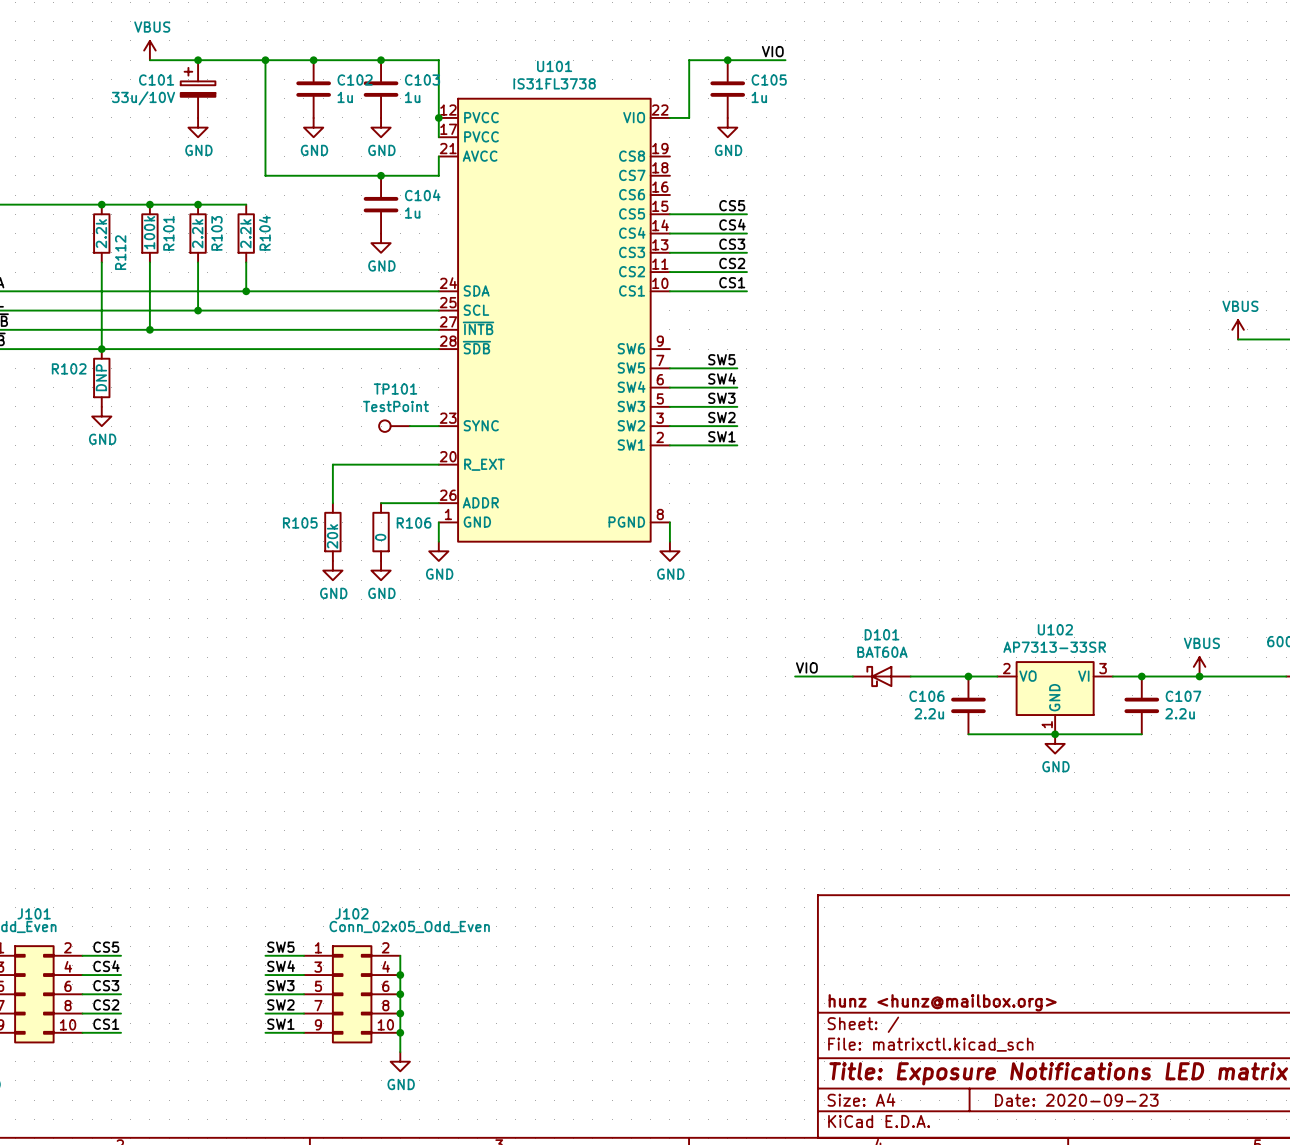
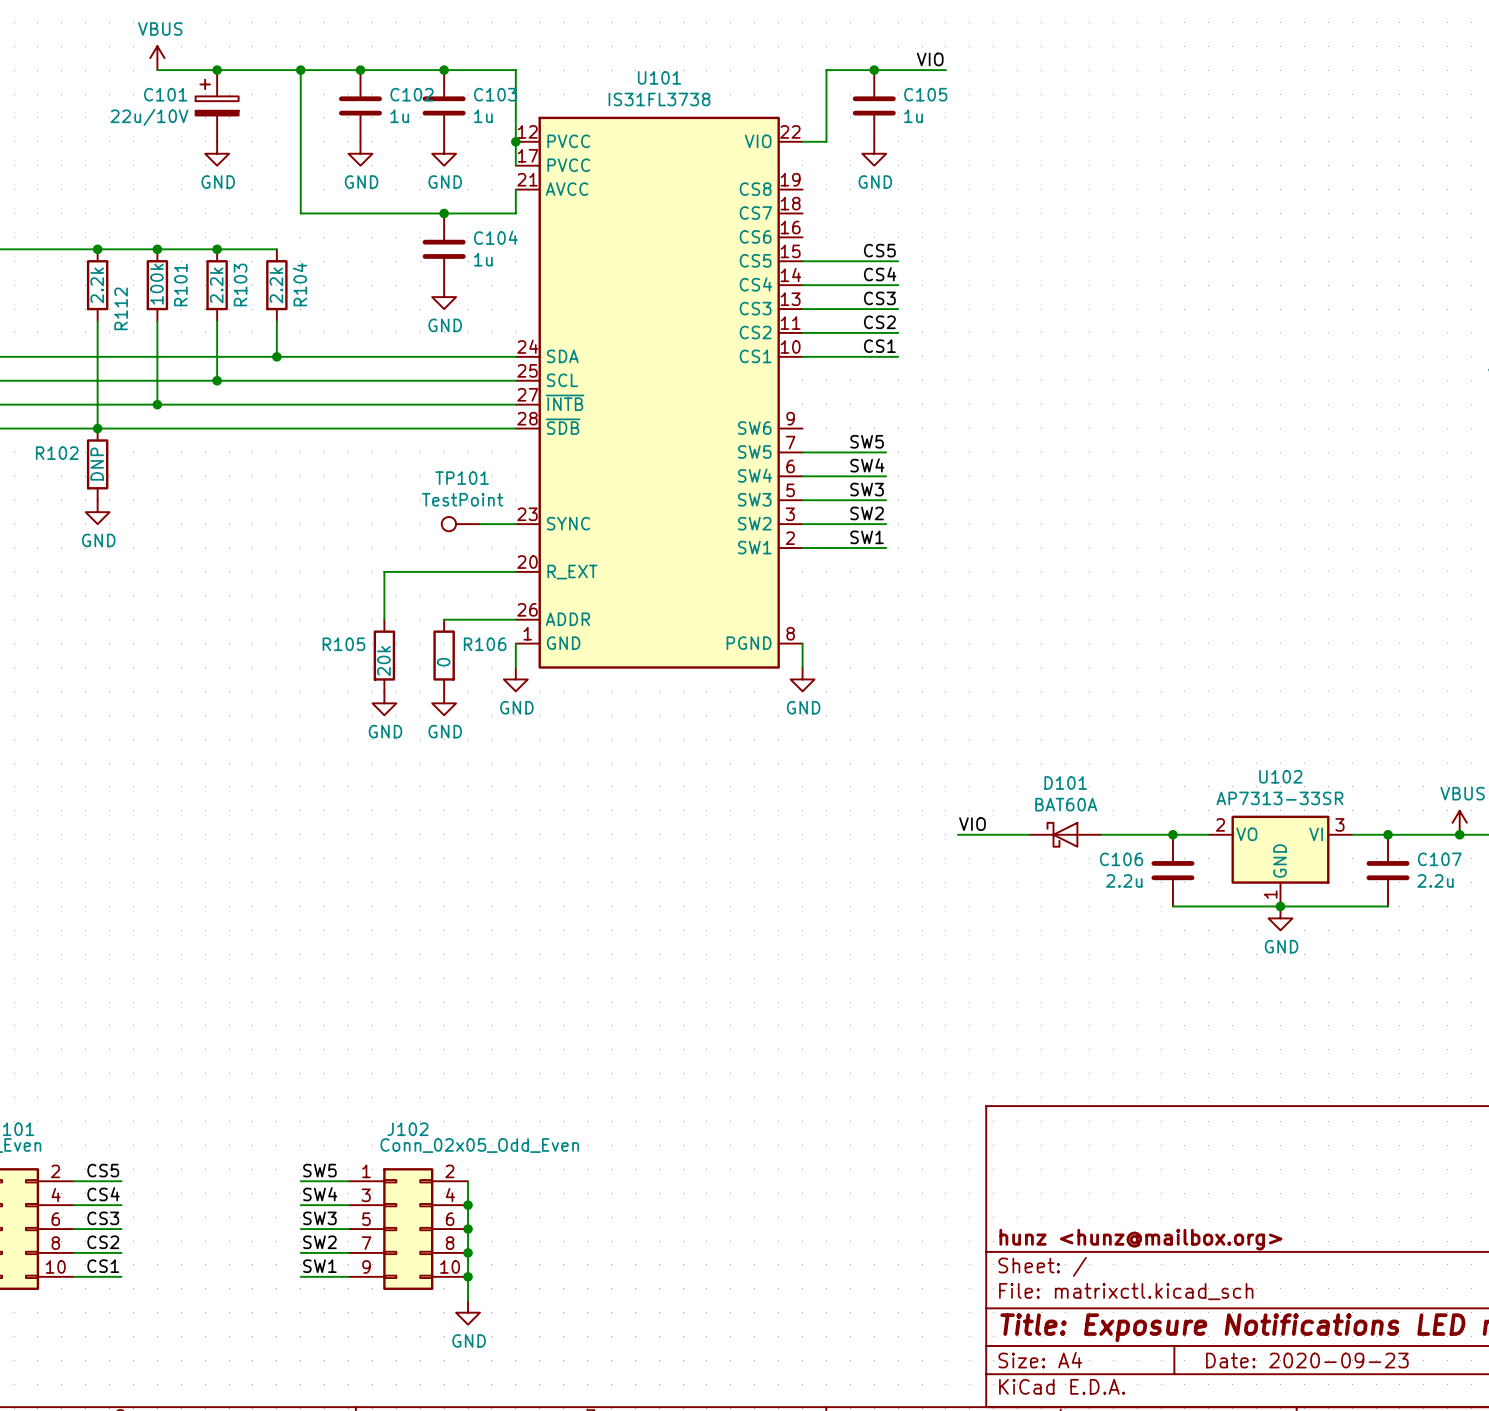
C101 value: 33u/10V (143, 98) -> 22u/10V (149, 117)

